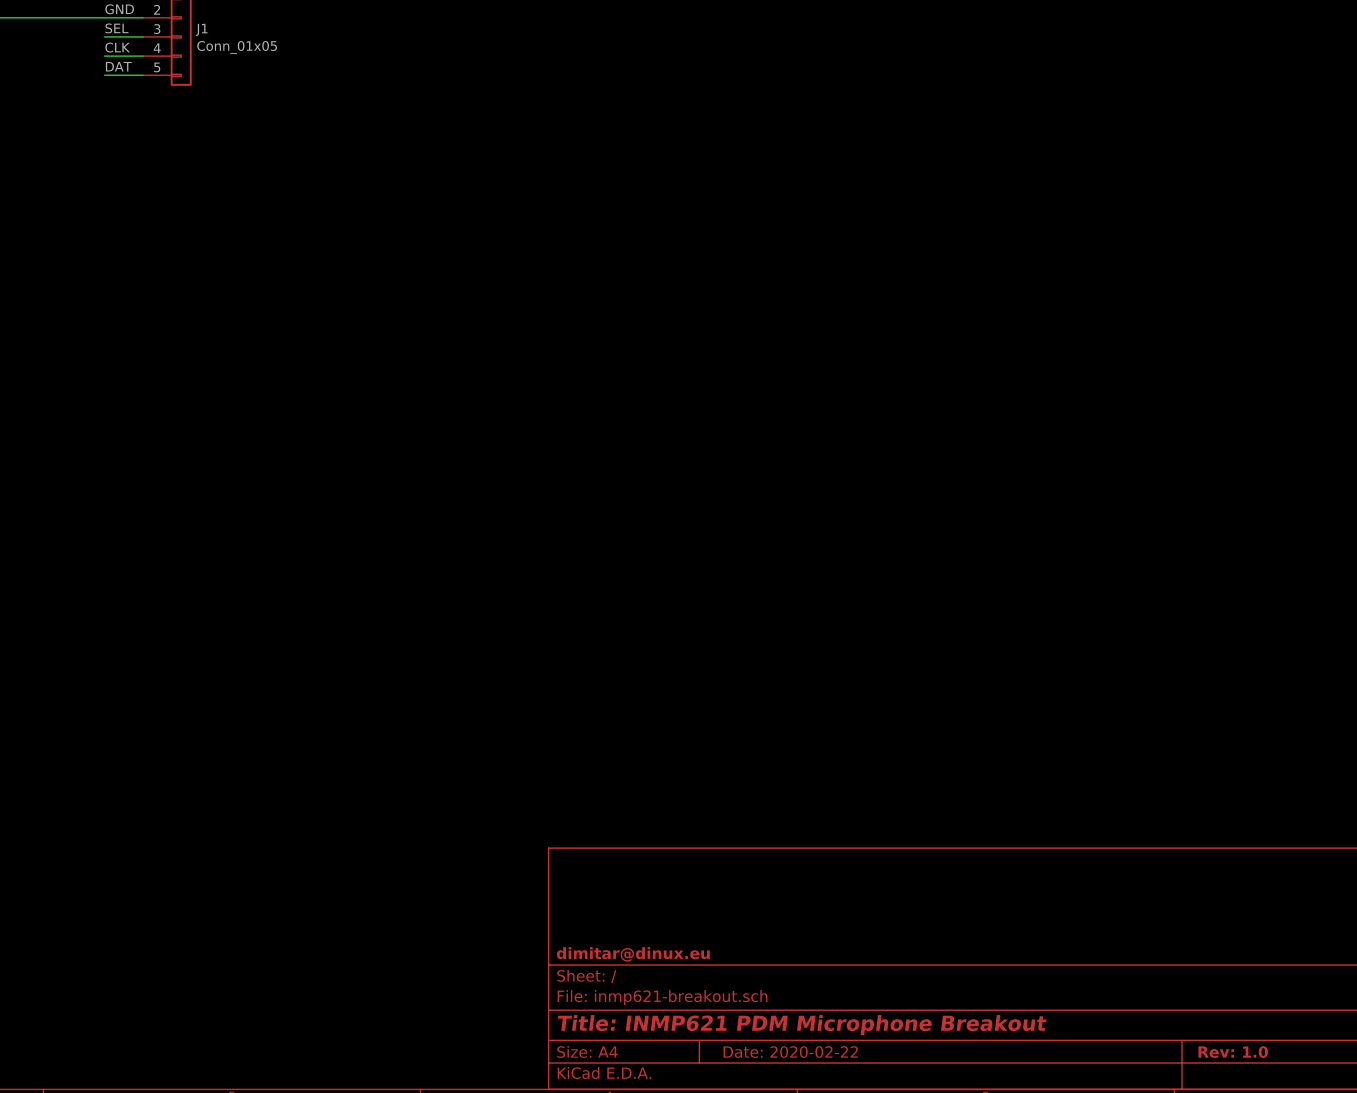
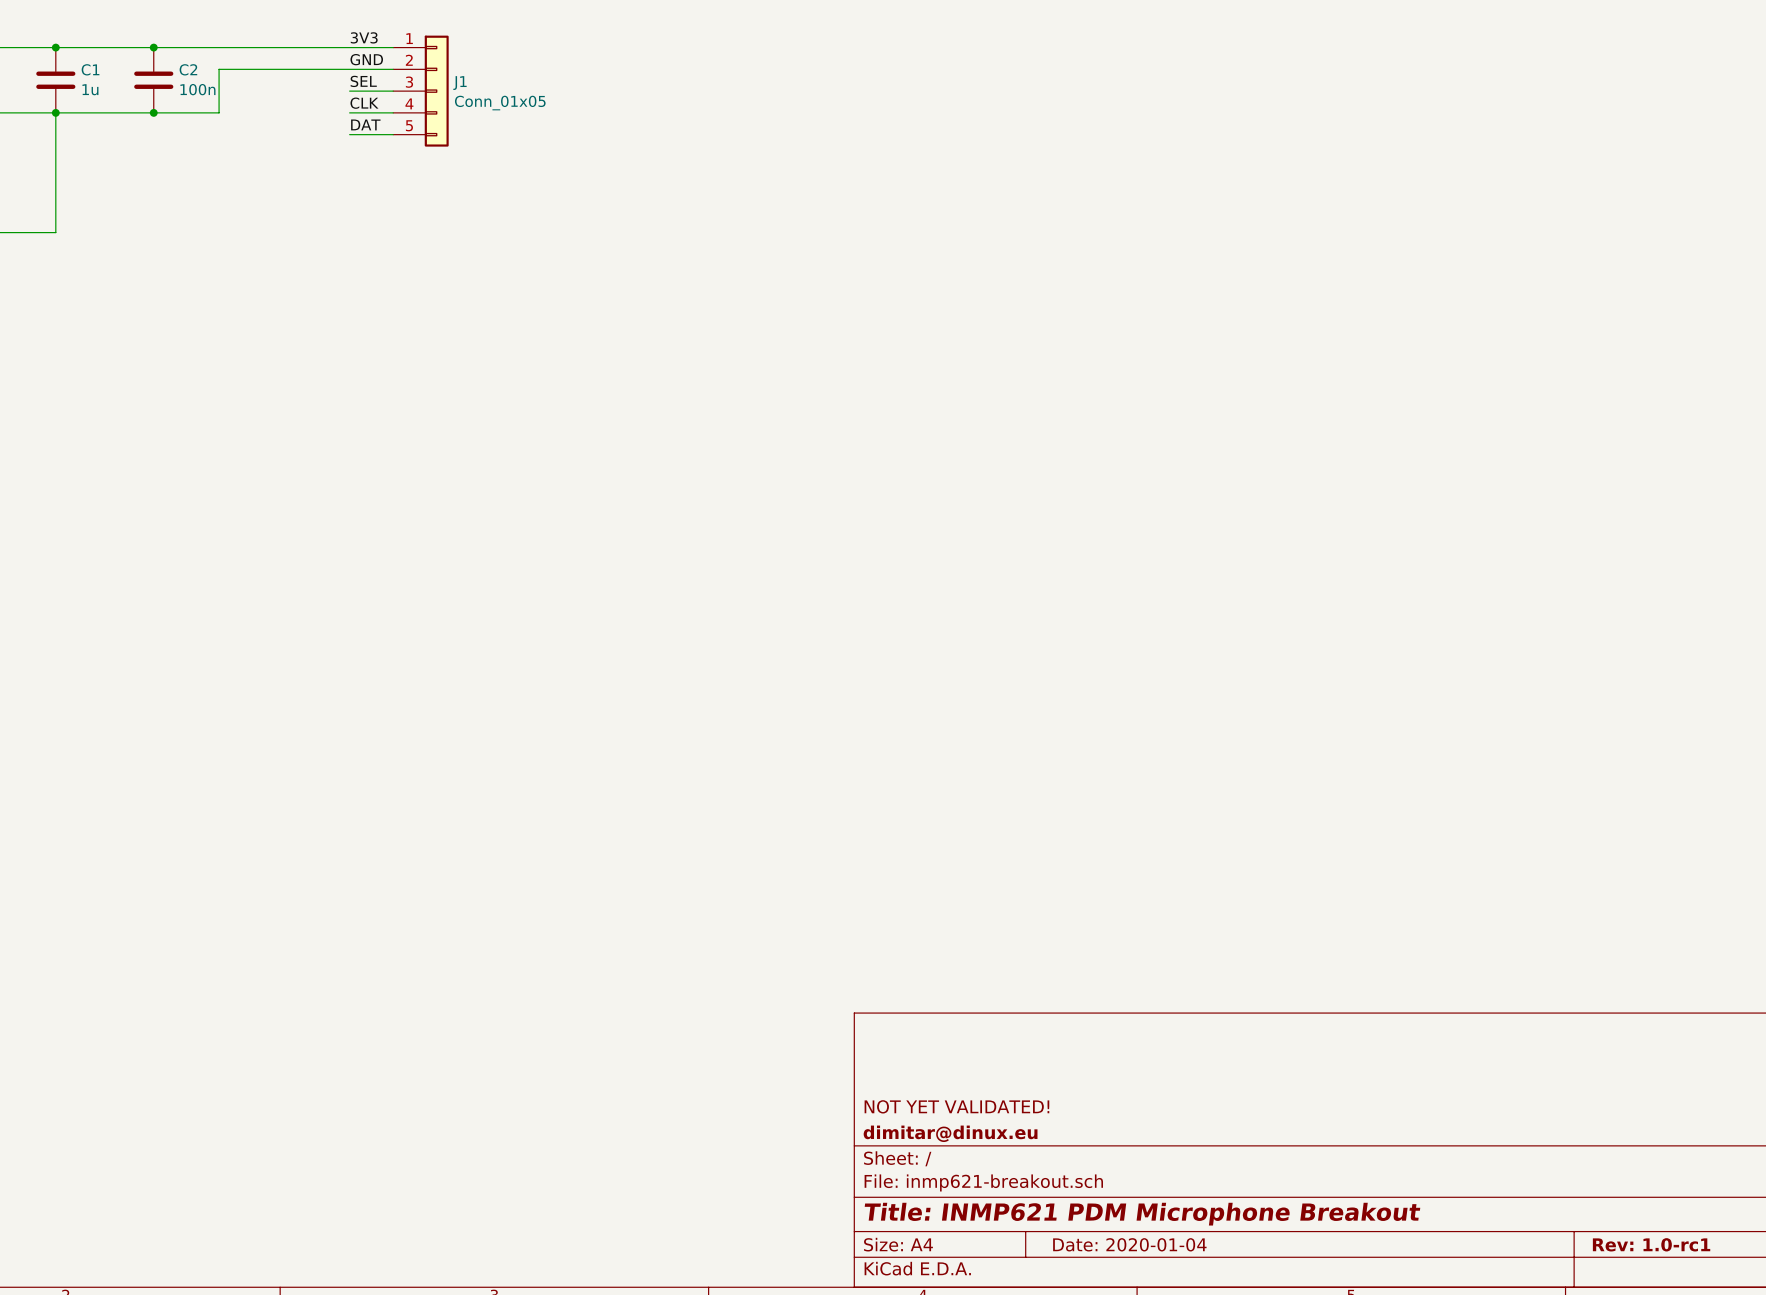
title block: none -> NOT YET VALIDATED! (956, 1106)
title block: Date: 2020-02-22 (790, 1052) -> Date: 2020-01-04 (1129, 1244)
title block: Rev: 1.0 (1233, 1052) -> Rev: 1.0-rc1 (1651, 1244)

